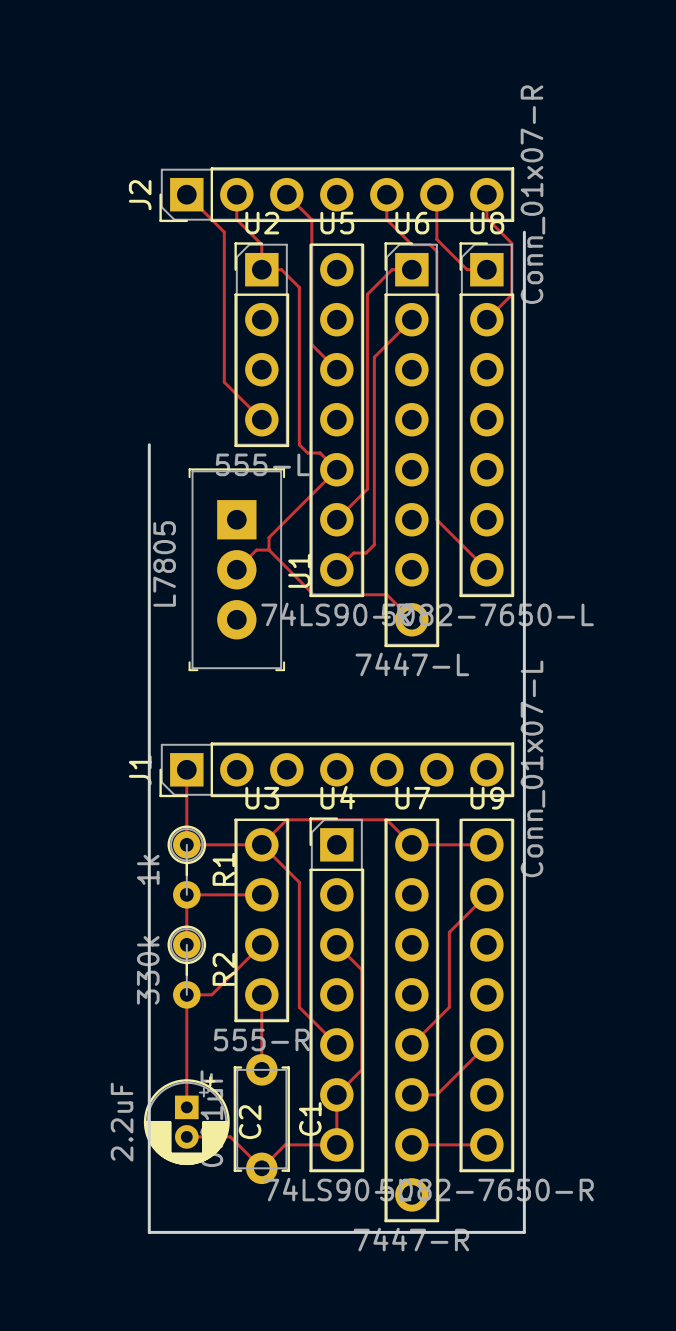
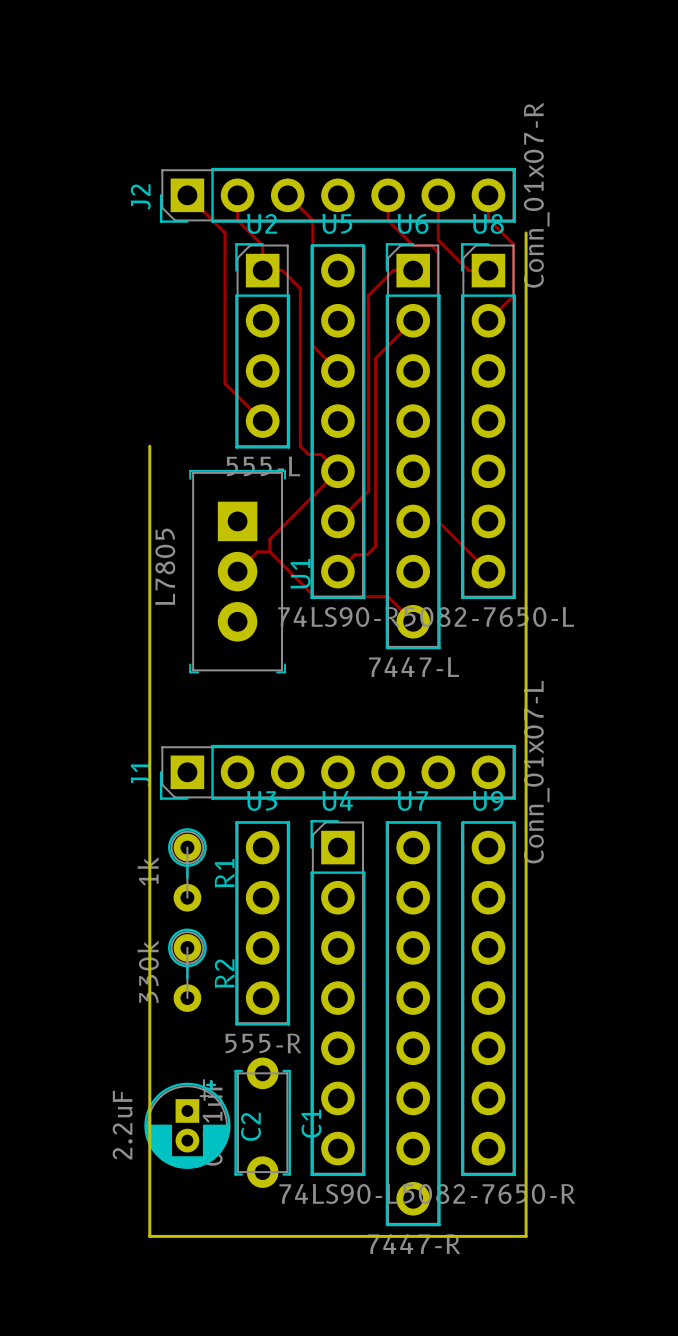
track: (186, 769) (186, 844) (261, 844) -> none
track: (261, 844) (286, 819) (386, 819) (411, 844) (486, 844) -> none
track: (261, 844) (299, 882) (299, 1007) (336, 1044) -> none
track: (261, 894) (186, 894) (186, 944) -> none
track: (486, 894) (449, 932) (449, 1007) (411, 1044) -> none
track: (261, 944) (211, 994) (186, 994) (186, 1107) -> none
track: (336, 944) (361, 969) (361, 1069) (336, 1094) (336, 1144) (285, 1144) (261, 1168) (230, 1136) (186, 1136) -> none
track: (261, 994) (261, 1069) -> none
track: (486, 1044) (436, 1094) (411, 1094) -> none
track: (411, 1144) (486, 1144) -> none

